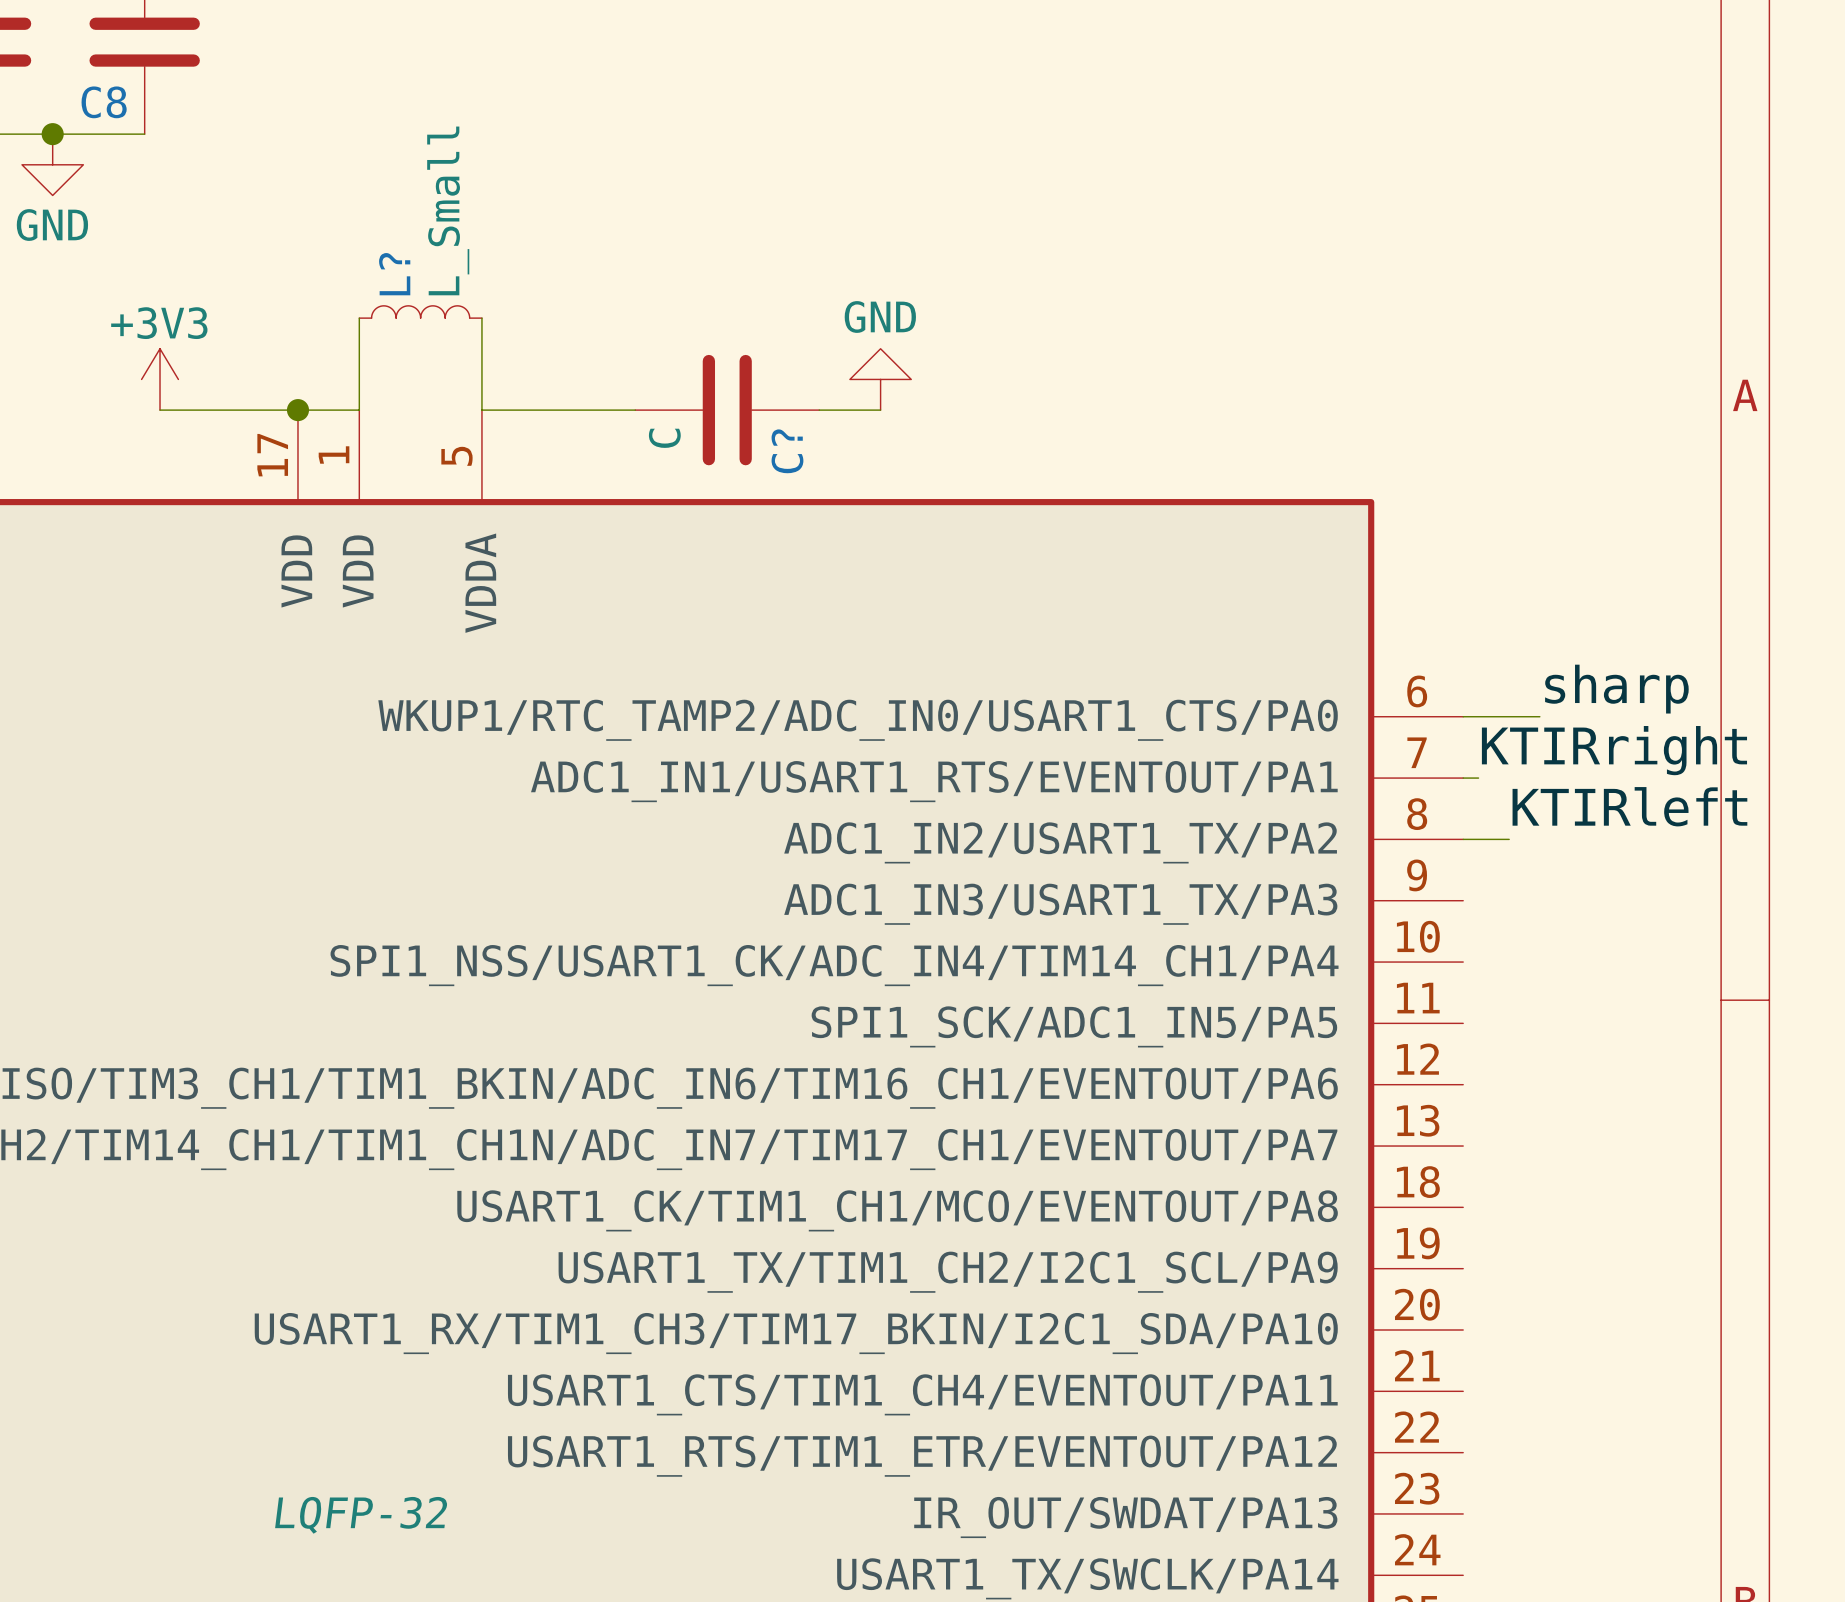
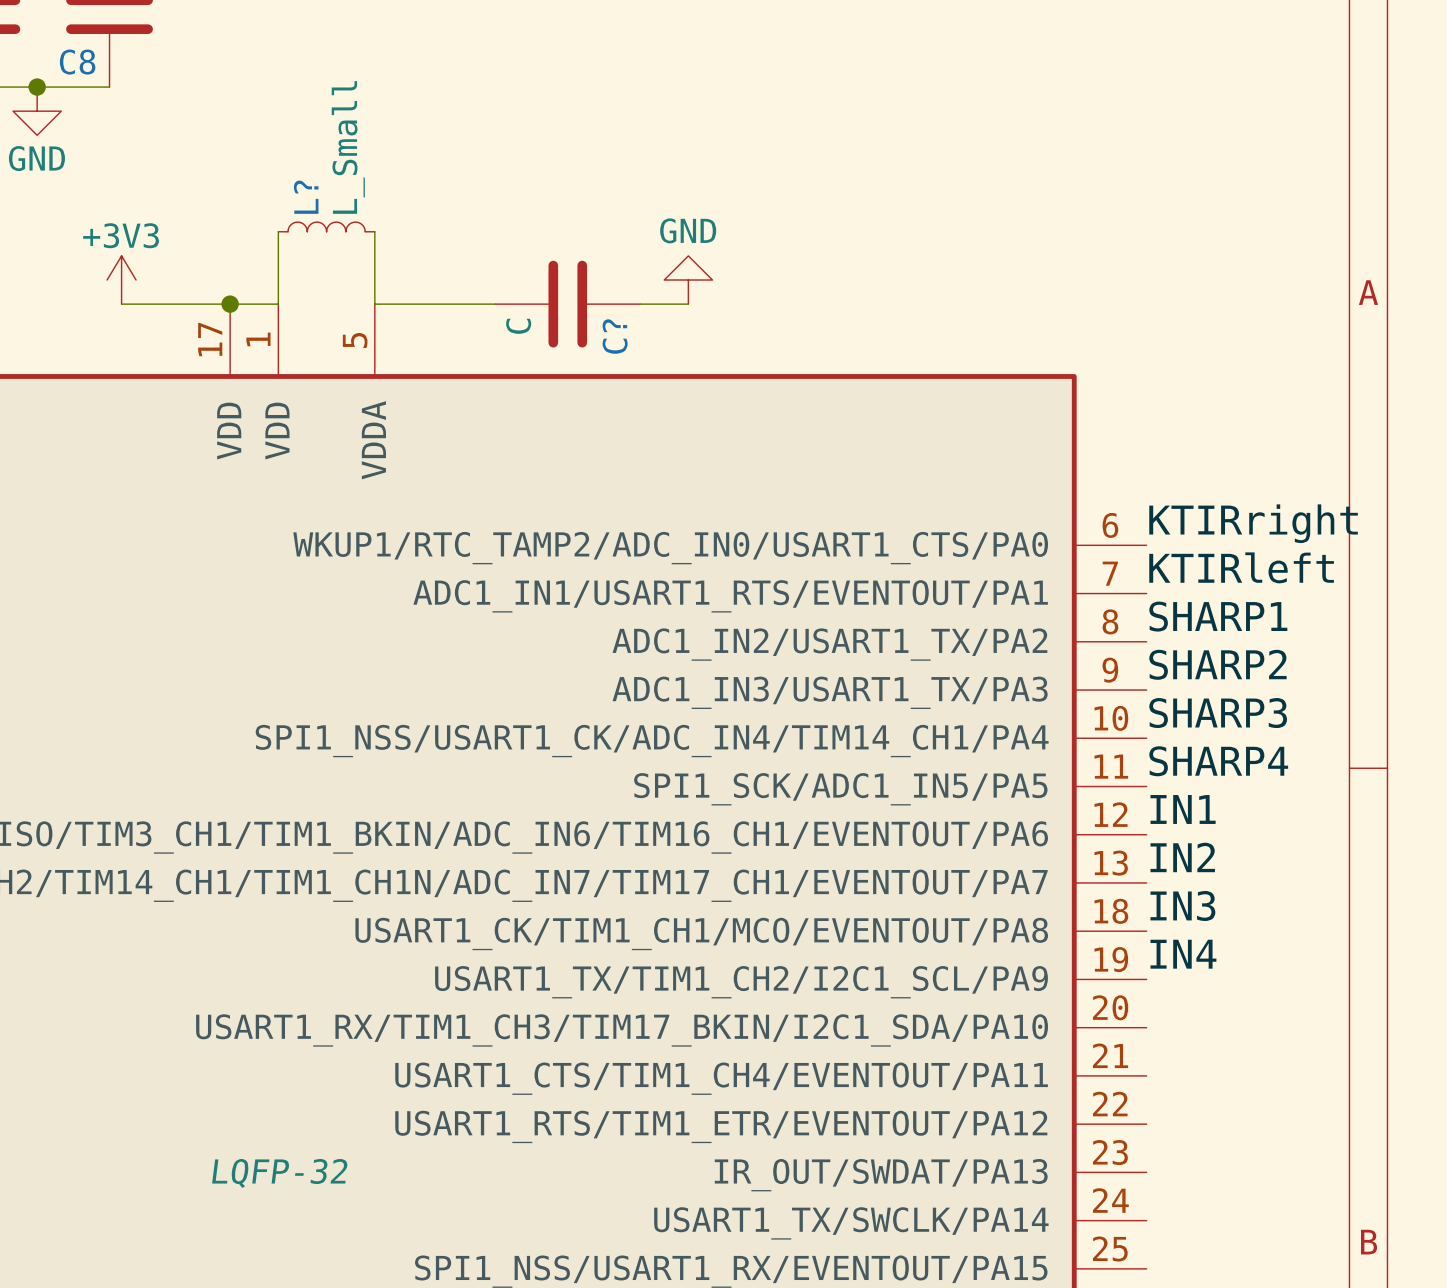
label: sharp (1616, 689) -> none
wire: (1463, 716) (1539, 716) -> none
label position: KTIRright (1614, 750) -> KTIRright (1253, 523)
wire: (1463, 778) (1478, 778) -> none
label position: KTIRleft (1629, 806) -> KTIRleft (1241, 567)
label: none -> SHARP1 (1218, 616)
wire: (1463, 839) (1509, 839) -> none
label: none -> SHARP2 (1217, 664)
label: none -> SHARP3 (1218, 713)
label: none -> SHARP4 (1218, 761)
label: none -> IN1 (1183, 809)
label: none -> IN2 (1182, 857)
label: none -> IN3 (1182, 905)
label: none -> IN4 (1183, 954)

